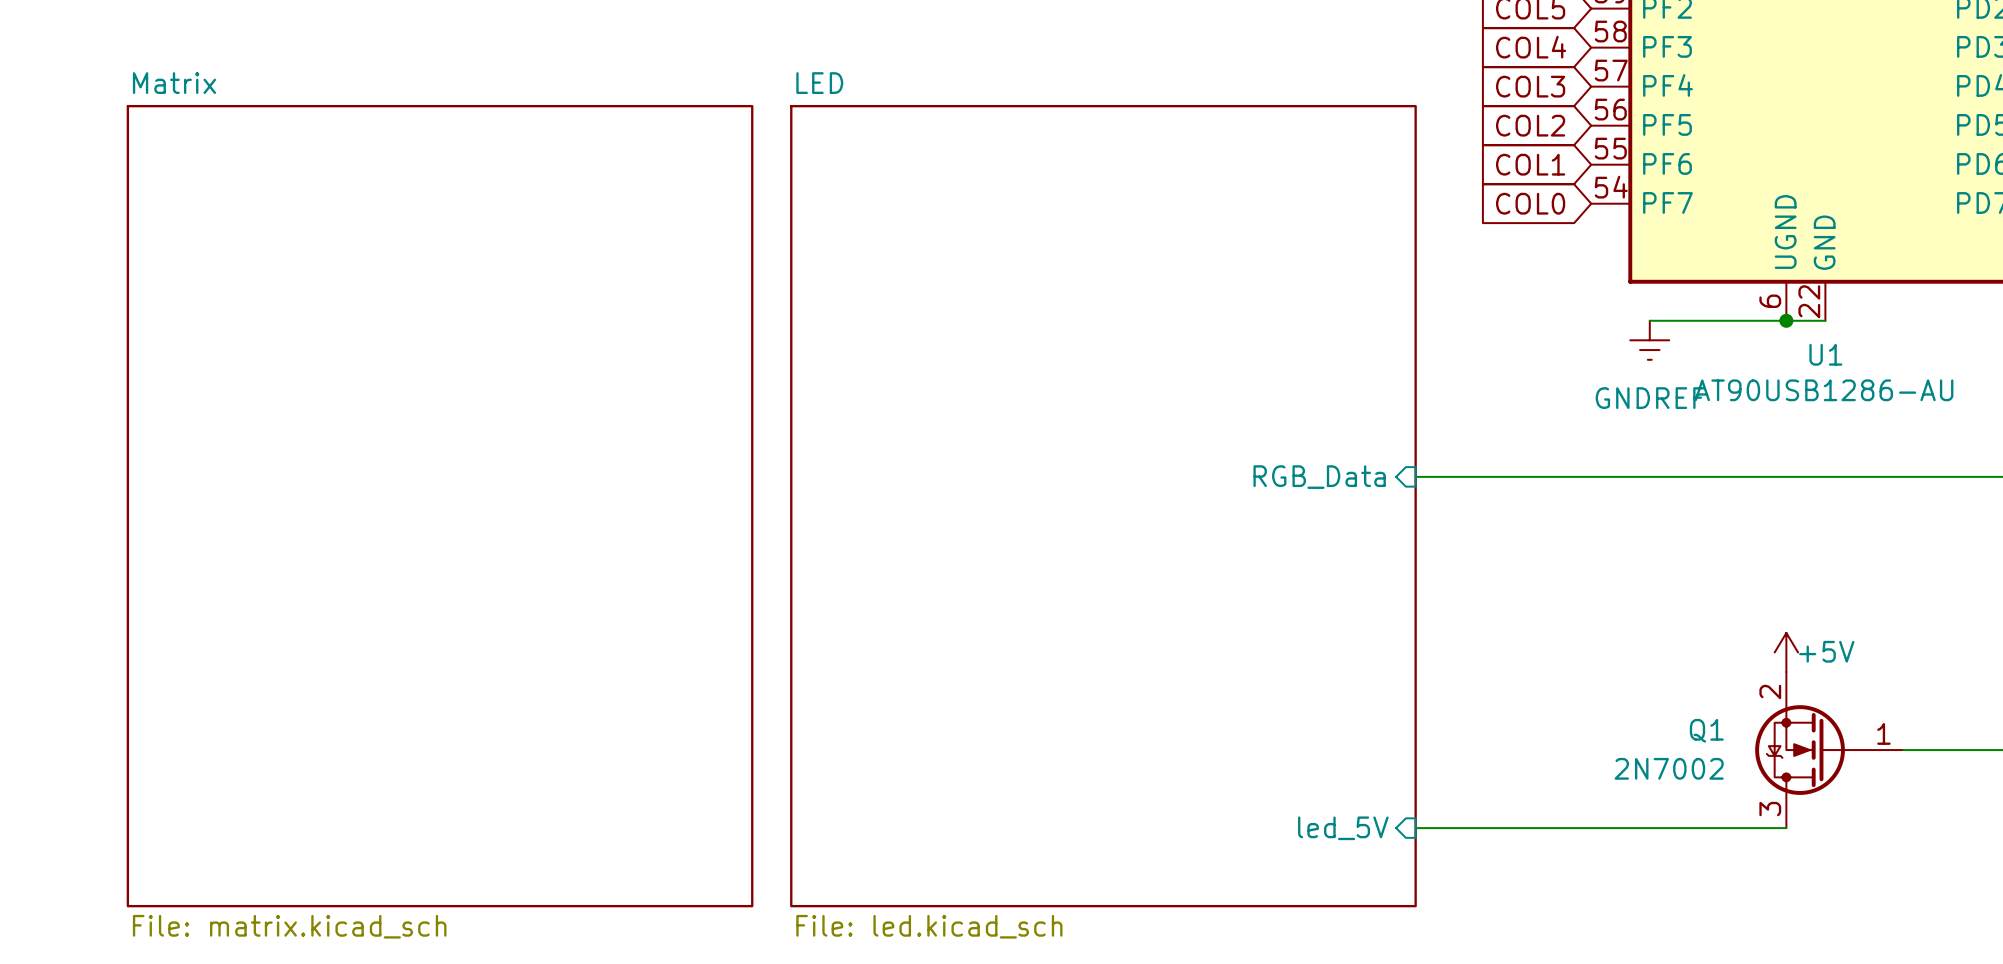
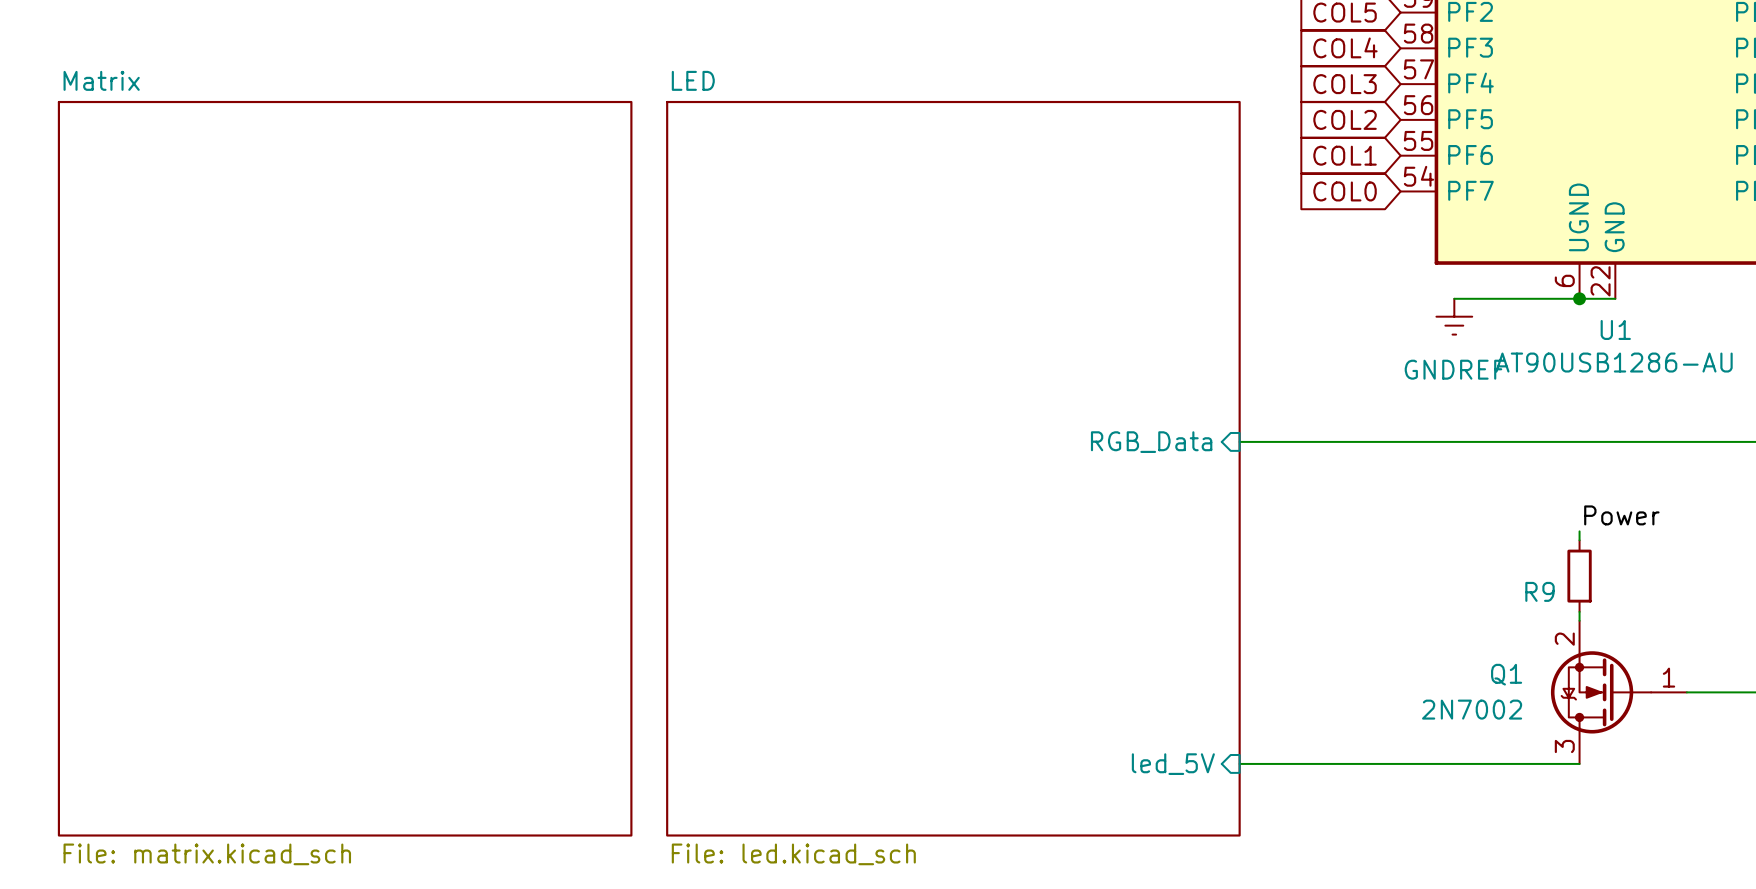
label: none -> Power (1621, 515)
wire: none -> (1579, 531) (1579, 540)
R9: none -> (1579, 576)
power symbol: +5V (1786, 652) -> none

